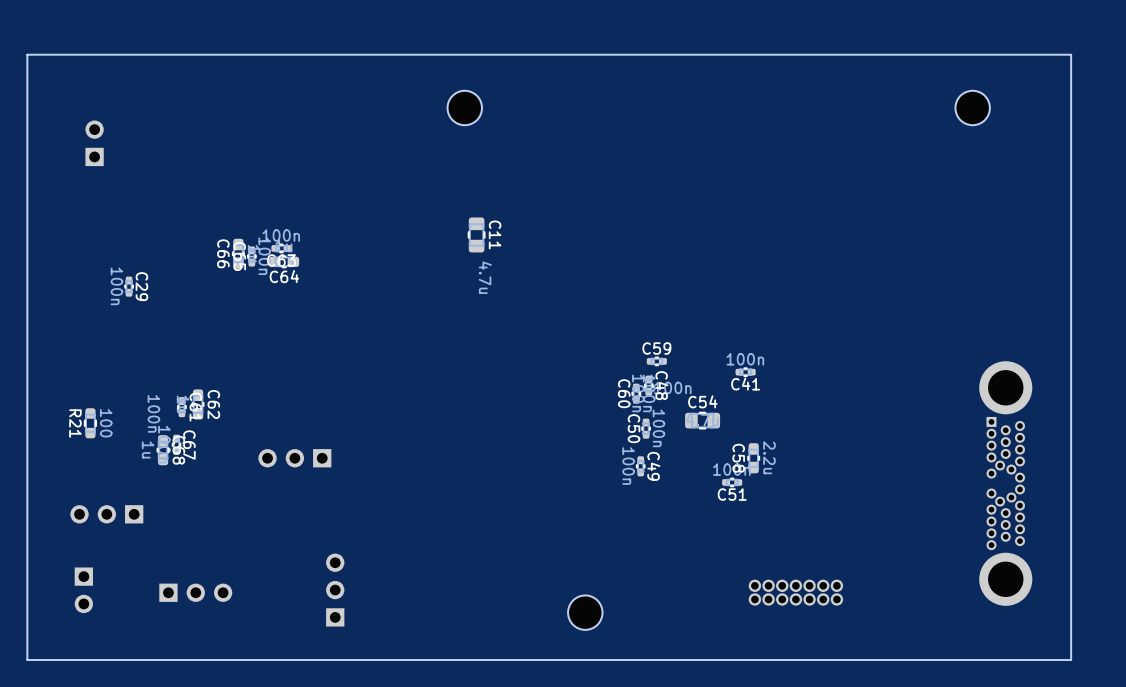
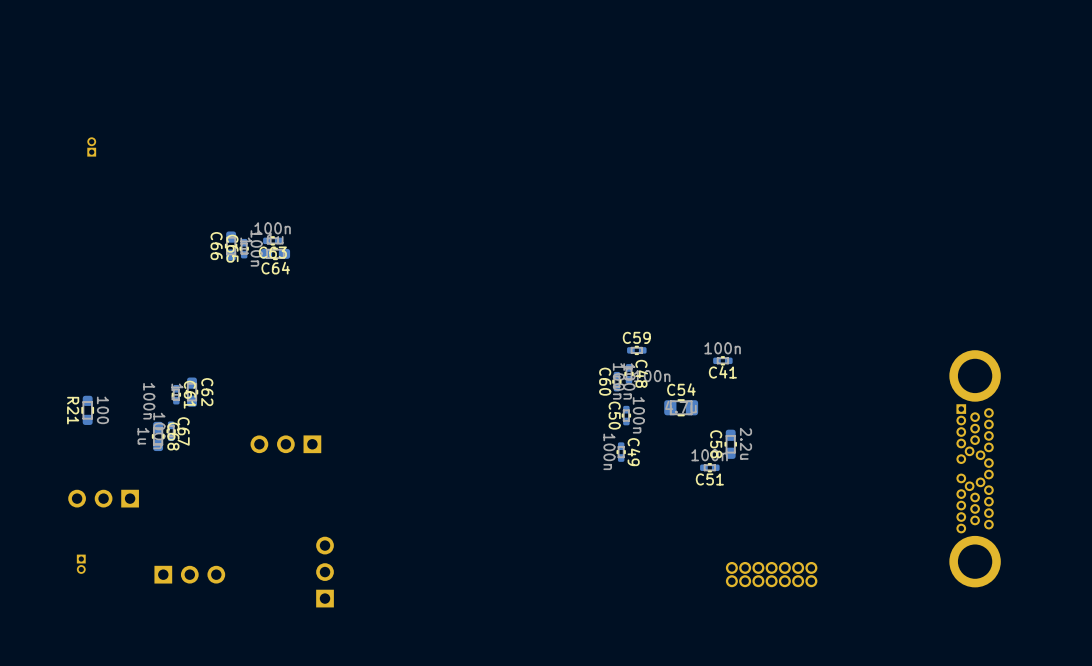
board edge: (1071, 54) (27, 54) (27, 660) (1071, 660) (1071, 54) -> none
part: (464, 107) -> none
part: (972, 107) -> none
part footprint: [85, 120, 104, 167] -> [87, 137, 97, 157]
C11: 4.7u (476, 234) -> none
C29: 100n (129, 286) -> none
part footprint: [74, 567, 93, 614] -> [76, 554, 86, 574]
part: (585, 612) -> none

